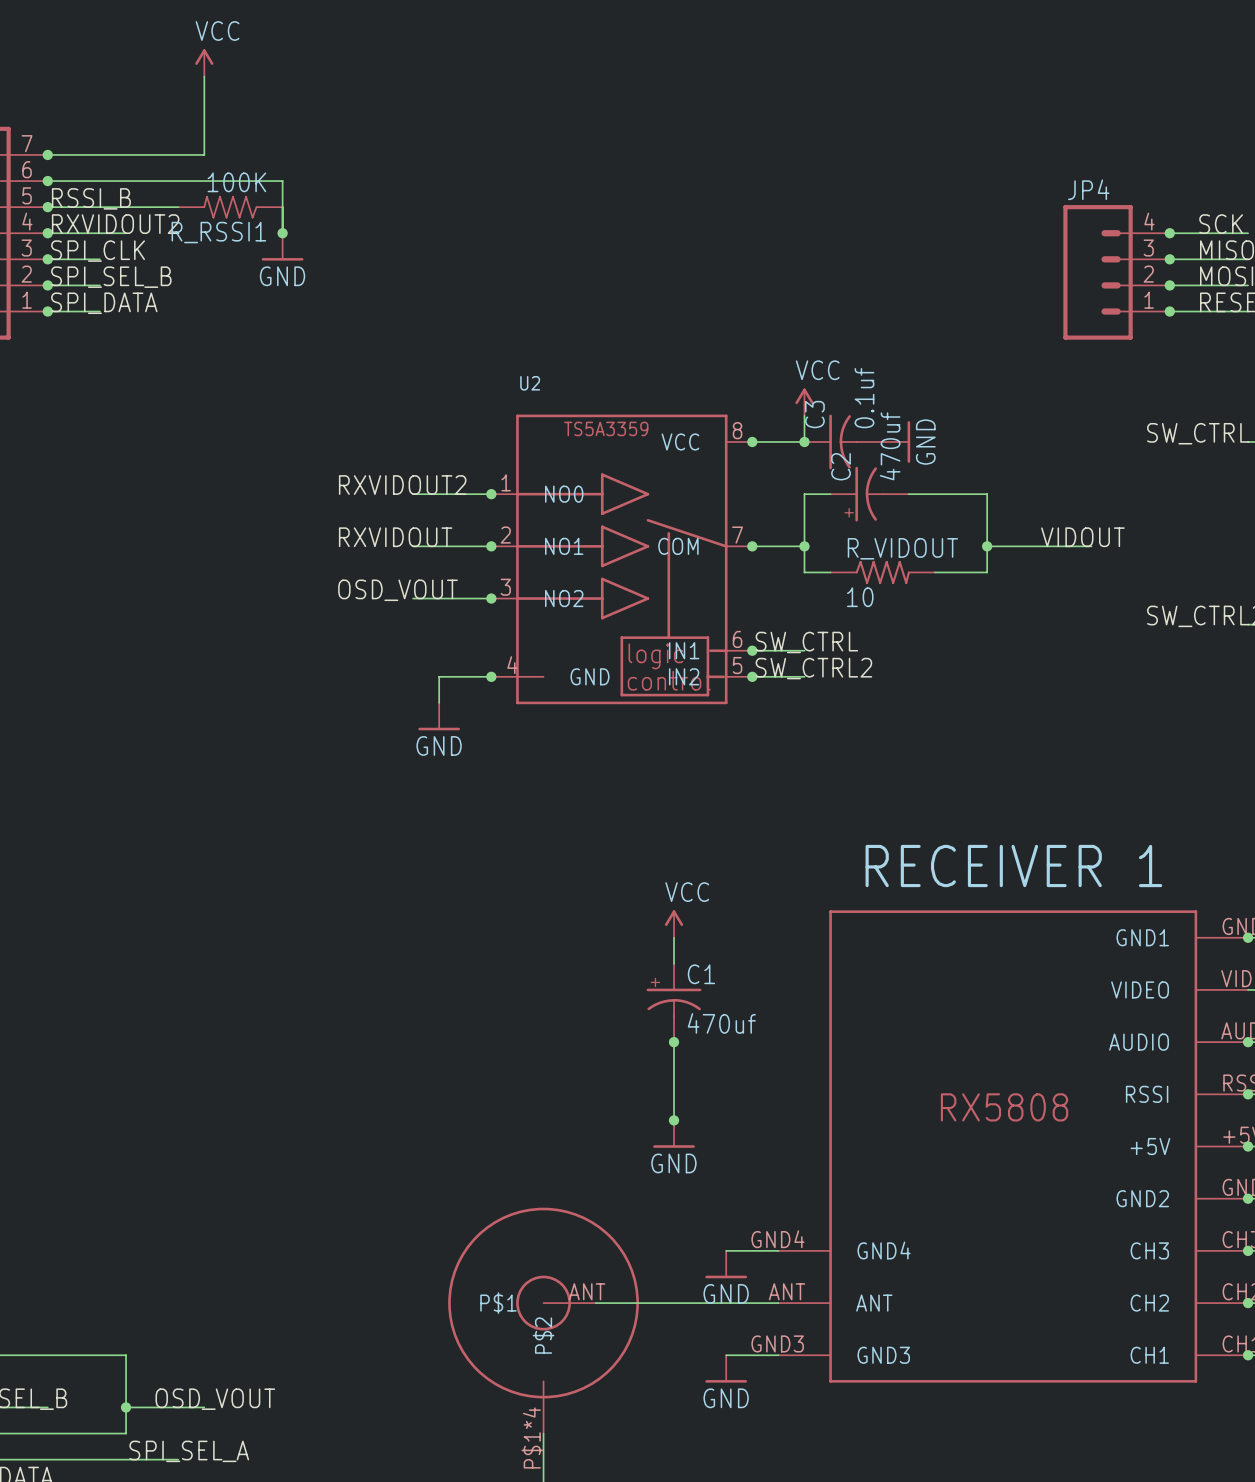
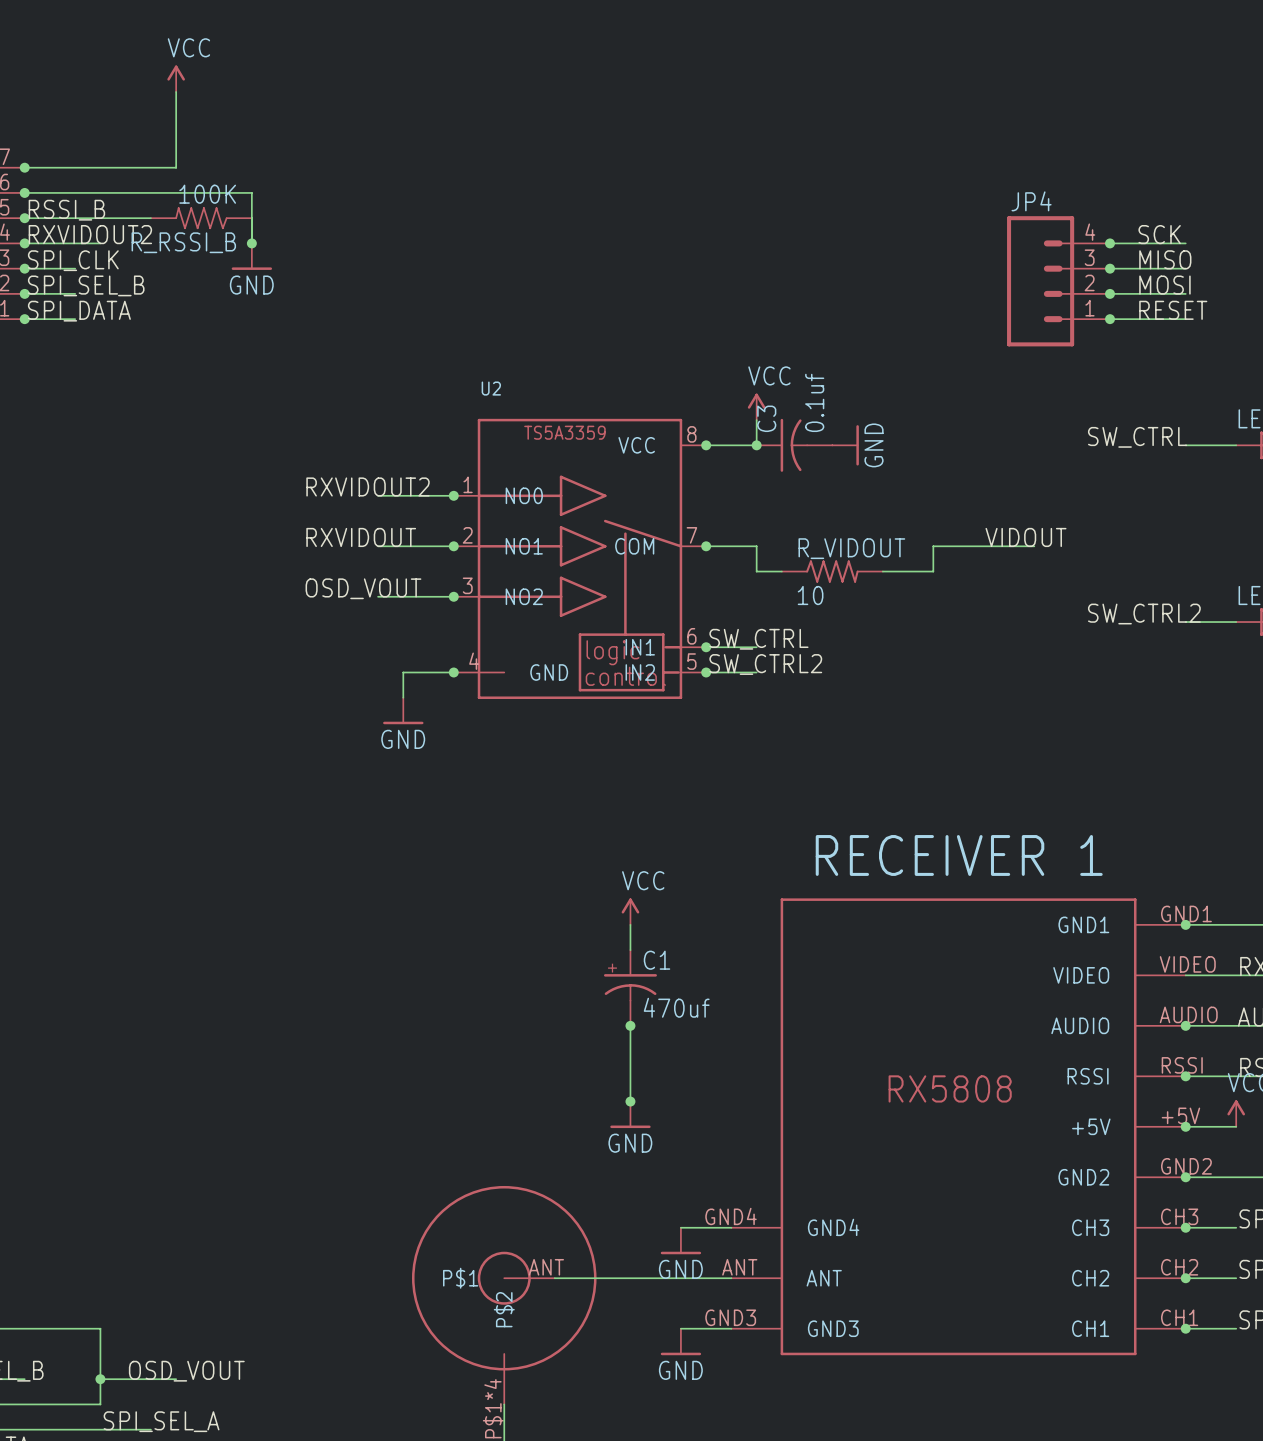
R_RSSI1 name: R_RSSI1 (218, 232) -> R_RSSI_B (183, 242)
wire: (830, 494) (804, 494) (804, 546) -> none
C2: 470uf (869, 494) -> none
wire: (908, 494) (987, 494) (987, 546) -> none
junction: (804, 546) -> none
junction: (987, 546) -> none

